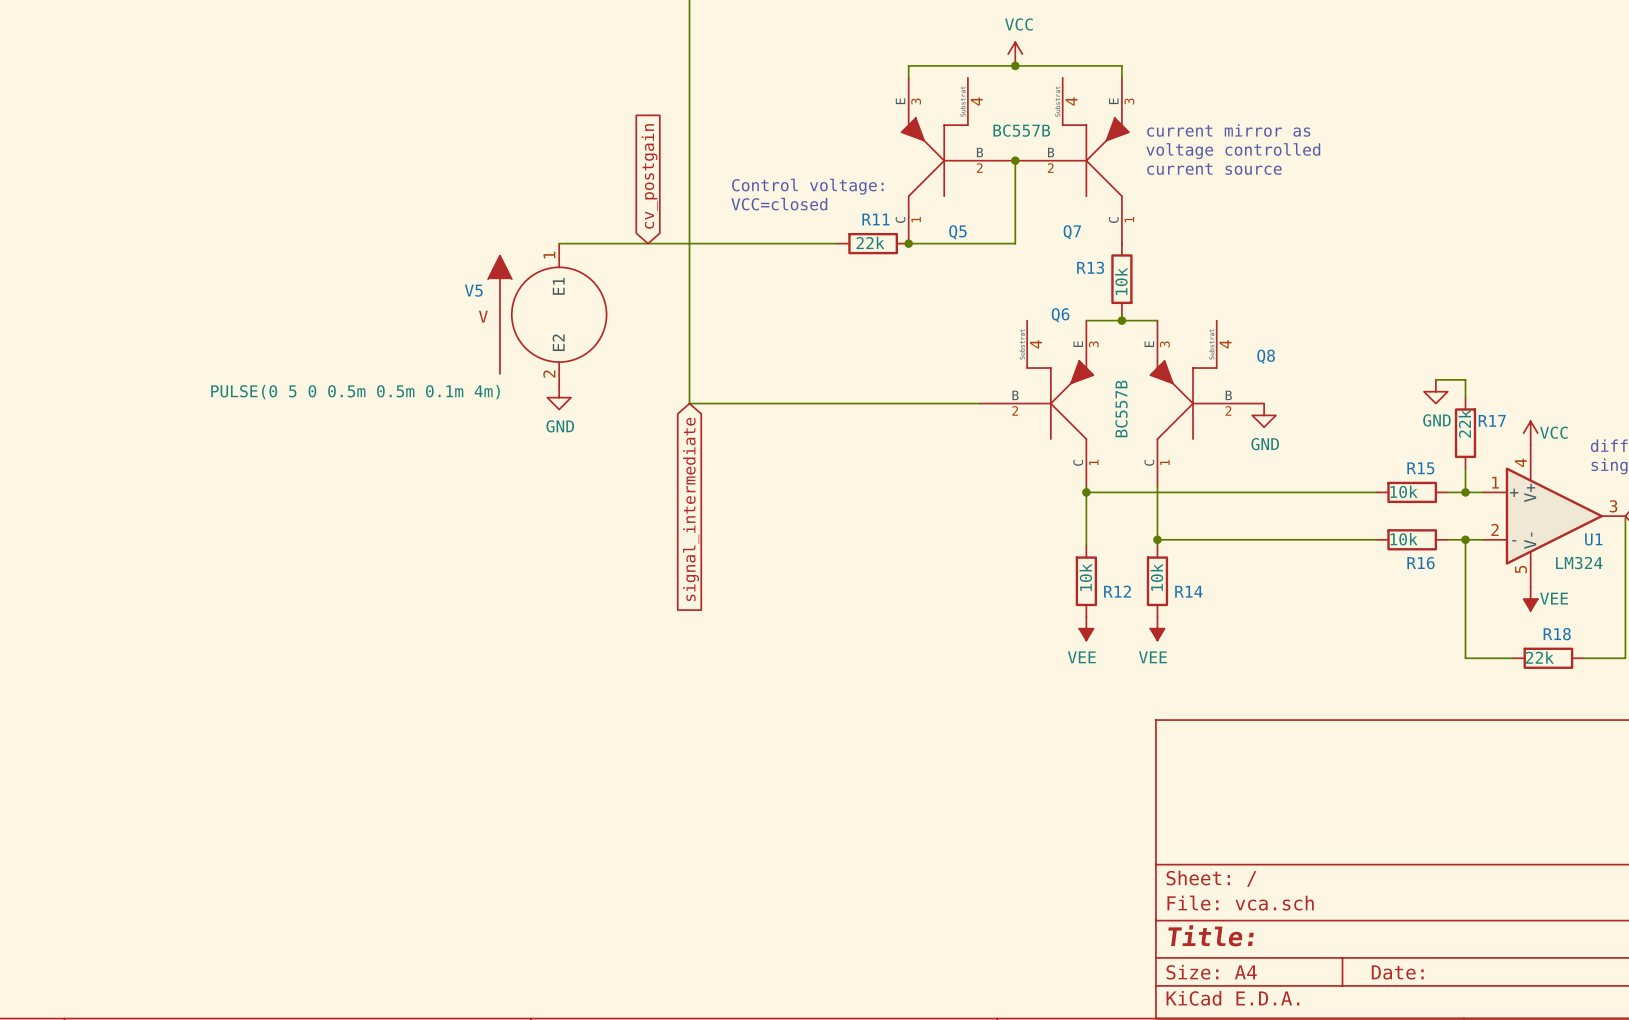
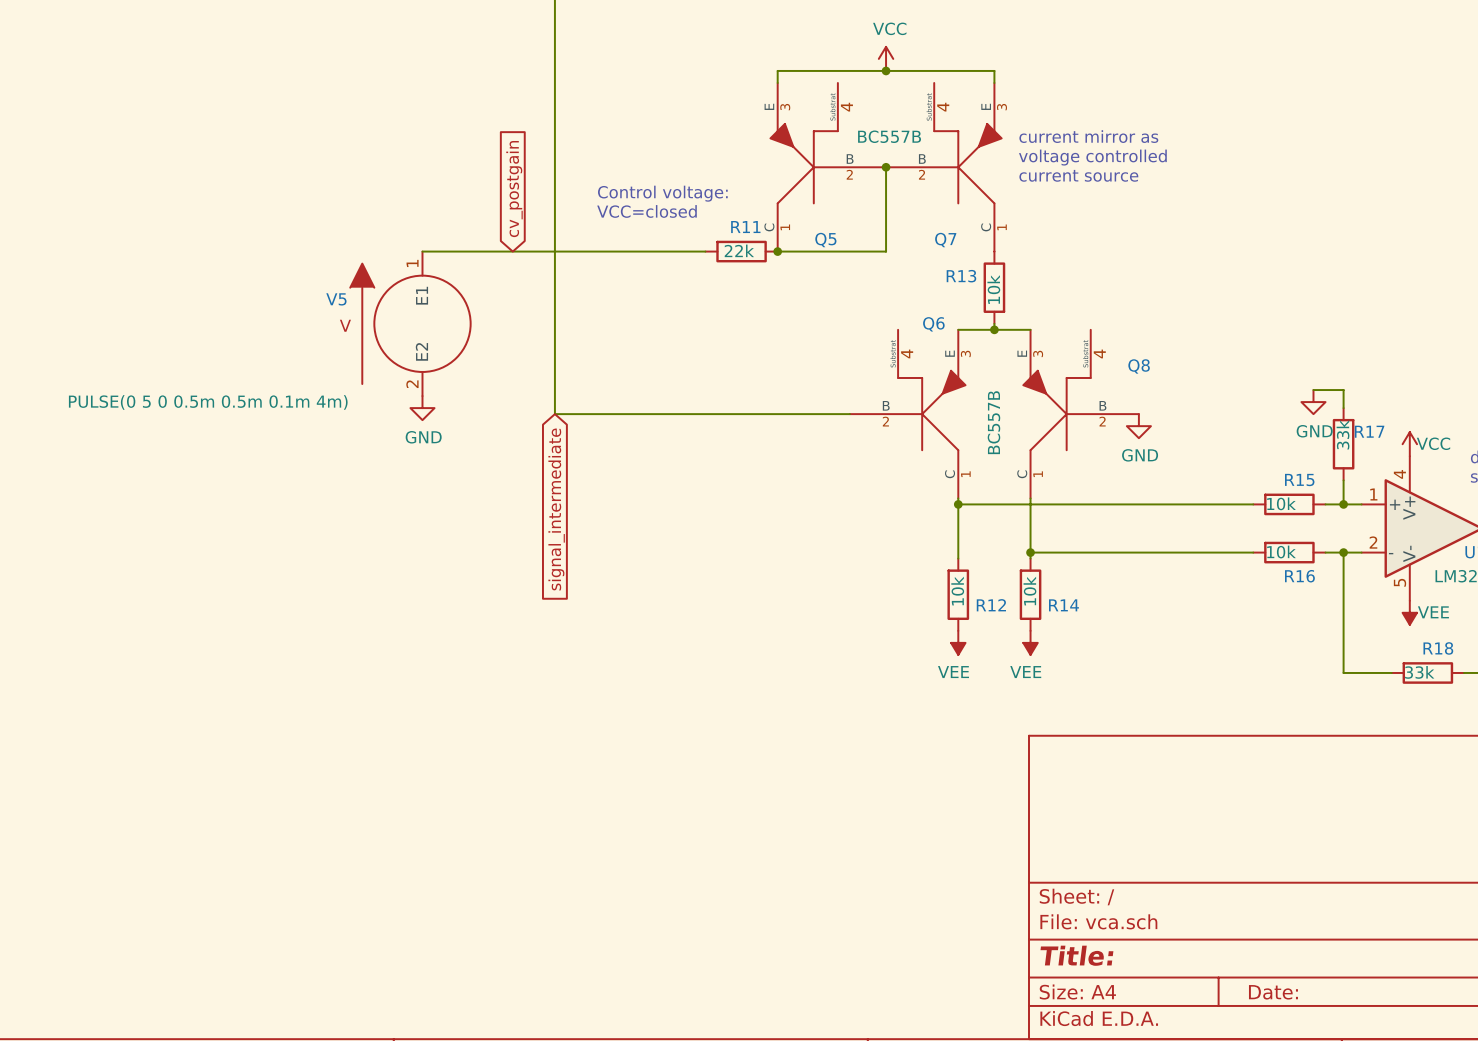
R17 value: 22k (1464, 423) -> 33k (1343, 434)
R18 value: 22k (1539, 657) -> 33k (1419, 672)

